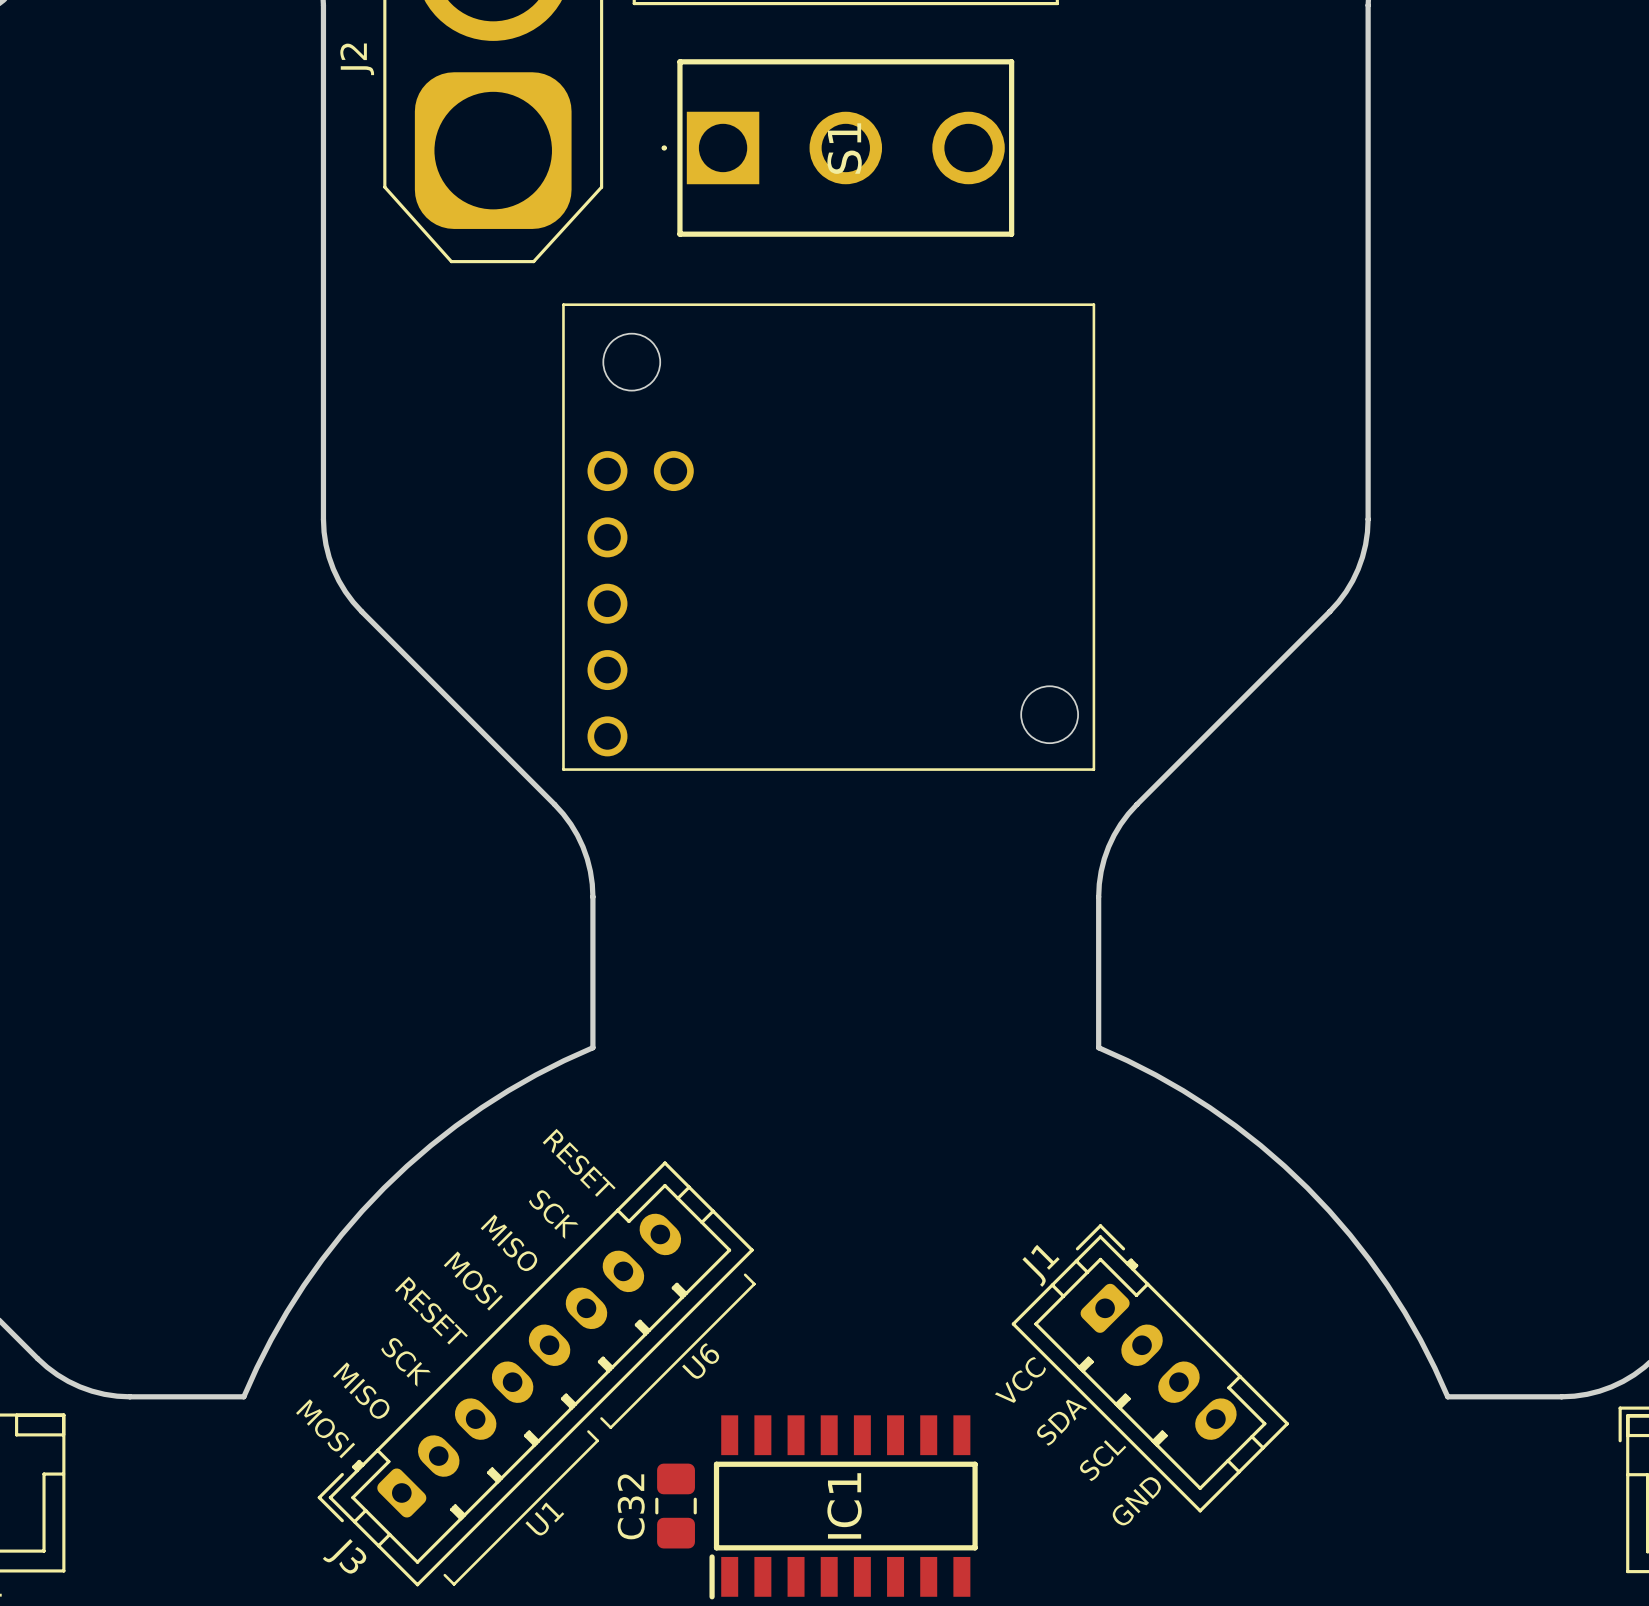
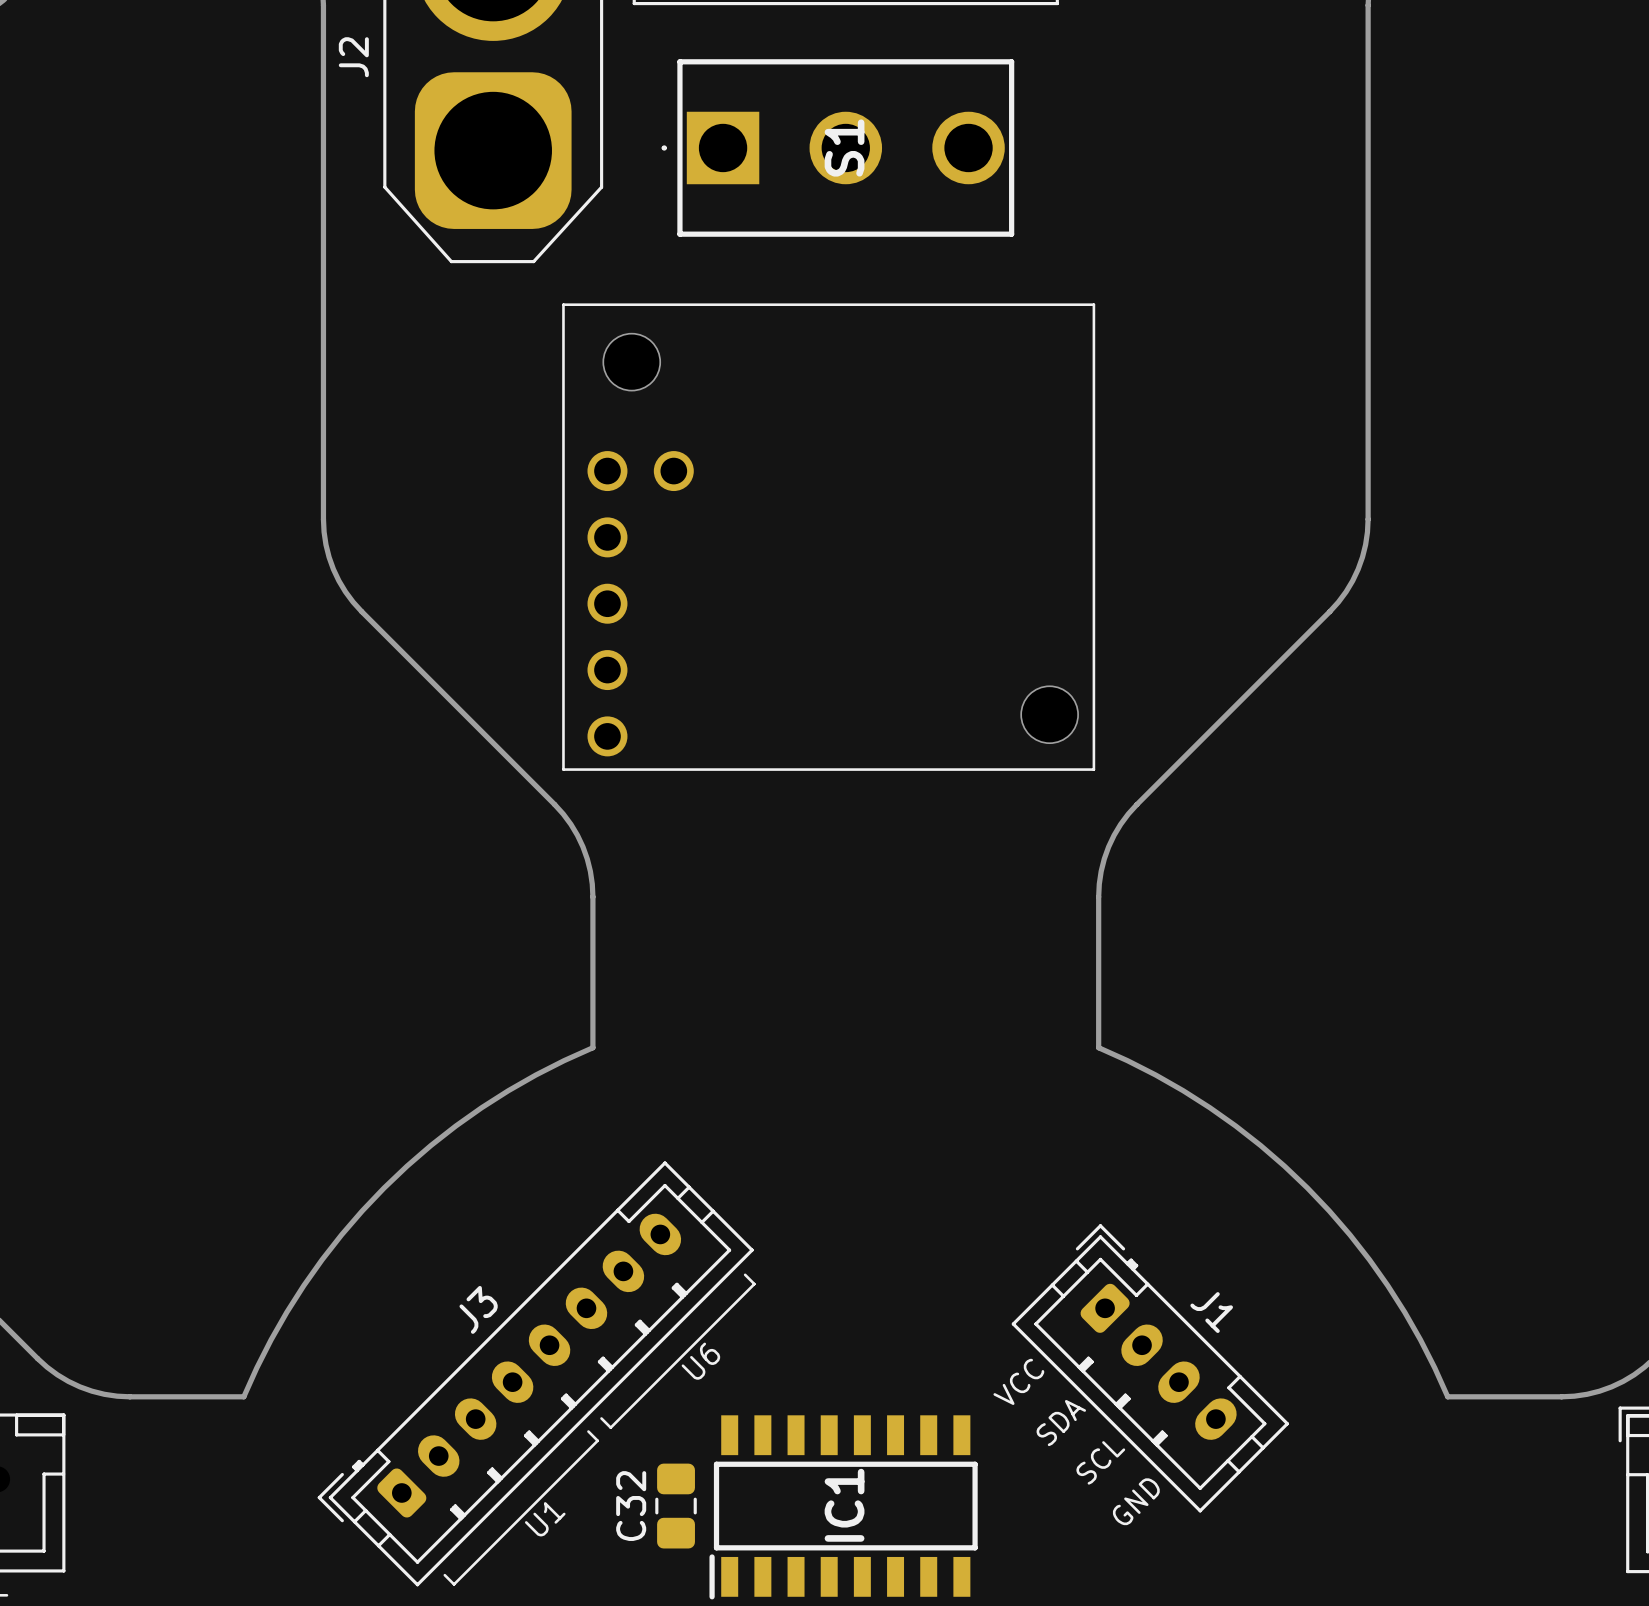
text: RESET (579, 1162) -> none
text: SCK (553, 1214) -> none
text: MISO (509, 1242) -> none
J1 name rotation: 0° (1041, 1265) -> 90° clockwise (1211, 1312)
J1 name position: J1 (1041, 1265) -> J1 (1211, 1312)
text: MOSI (473, 1281) -> none
text: RESET (431, 1310) -> none
text: SCK (405, 1362) -> none
text: MISO (361, 1390) -> none
text: MOSI (325, 1428) -> none
J3 name rotation: 0° (344, 1556) -> 90° counterclockwise (478, 1309)
J3 name position: J3 (344, 1556) -> J3 (478, 1309)

